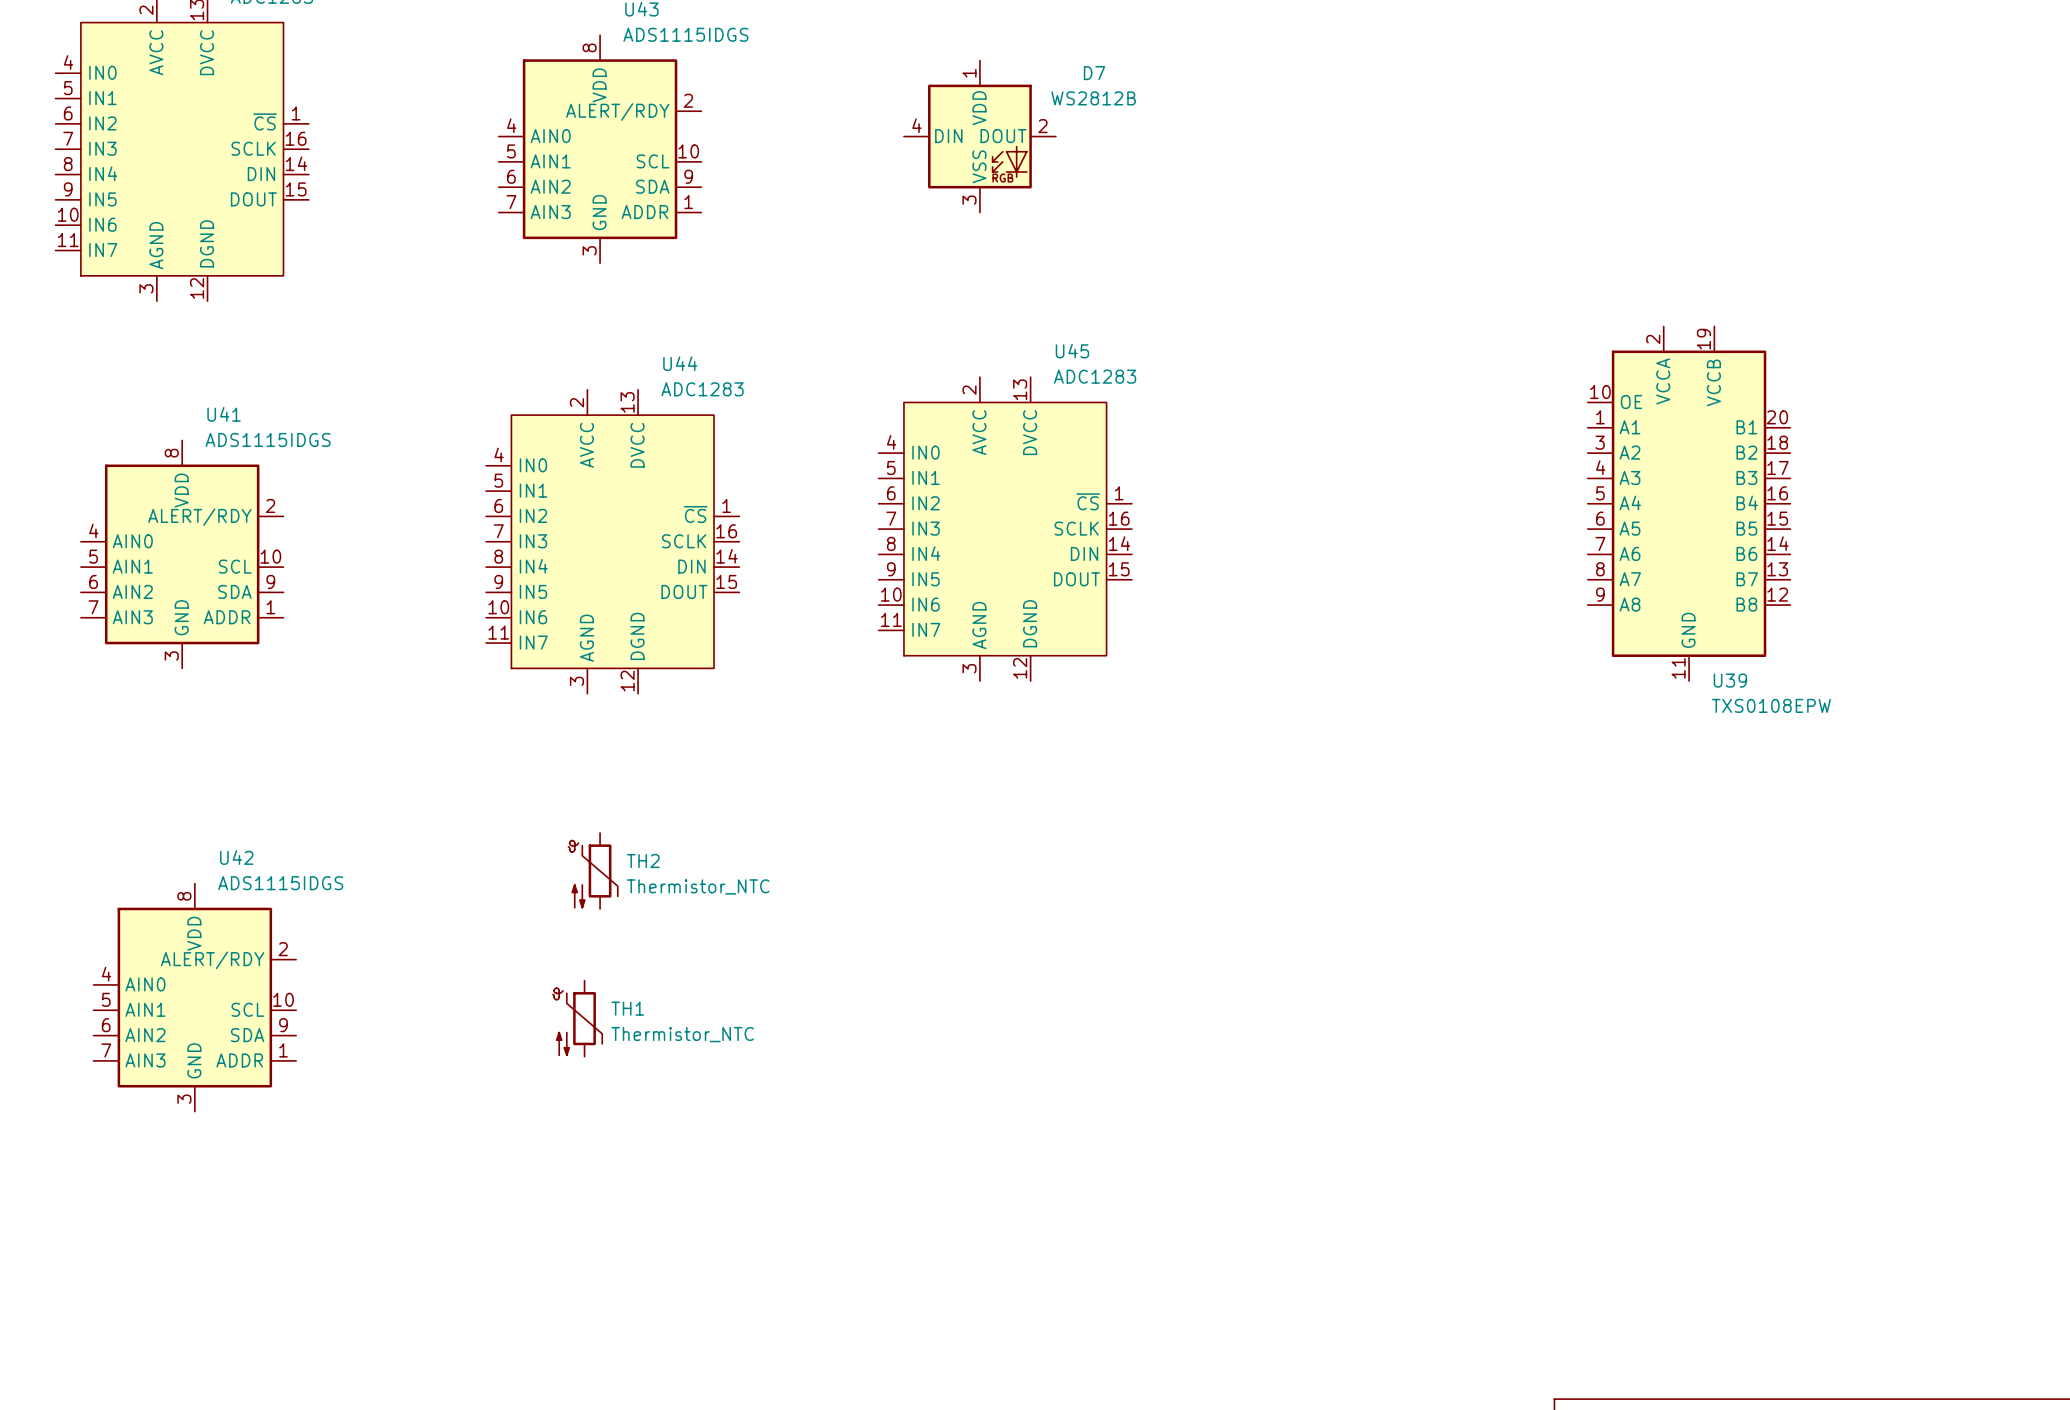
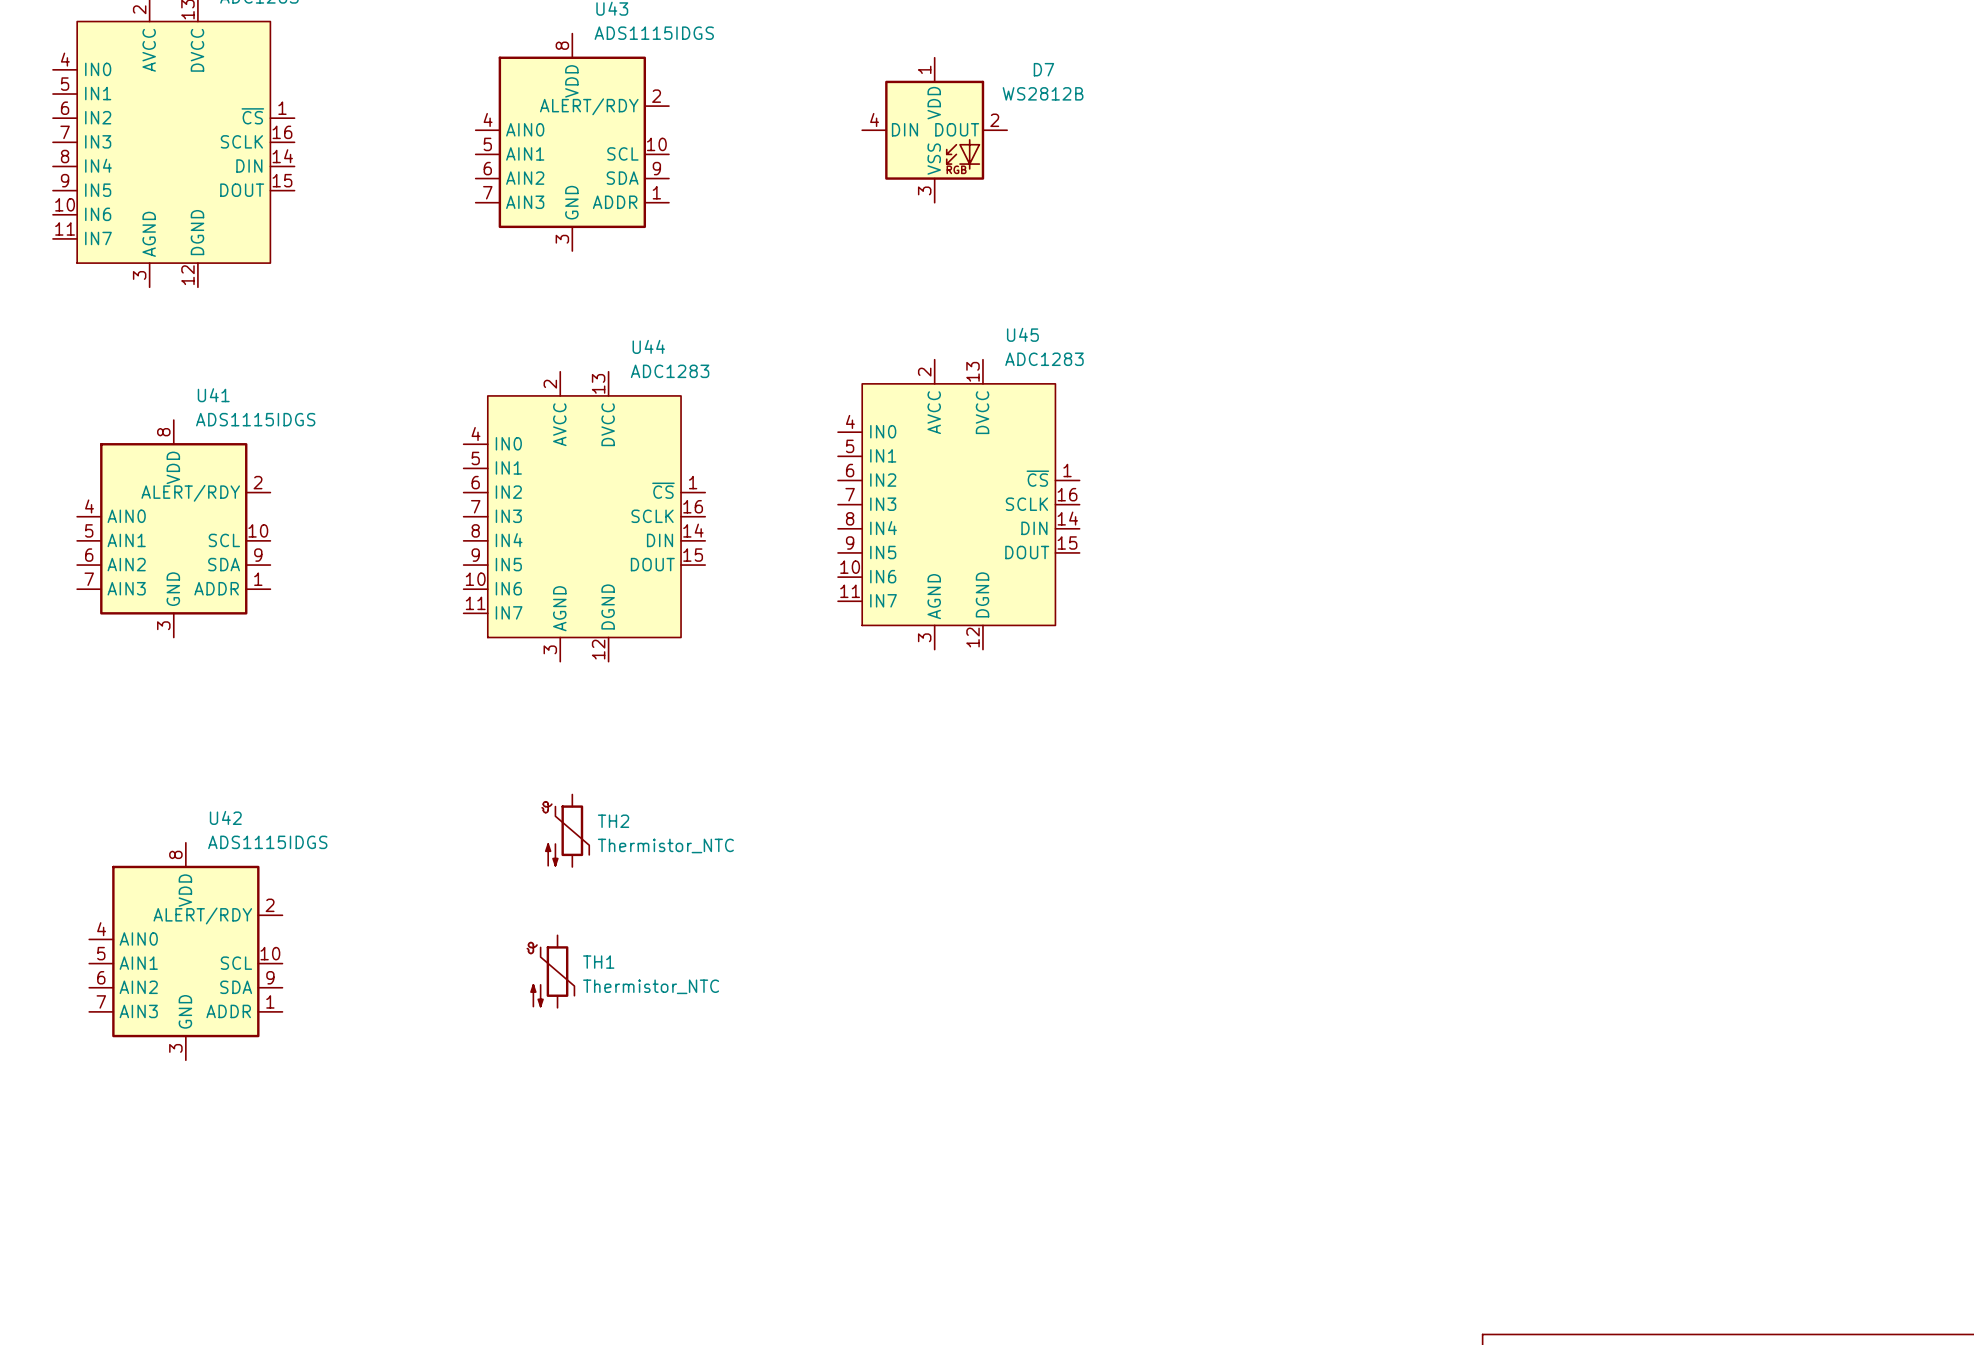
U39: TXS0108EPW (1689, 503) -> none

